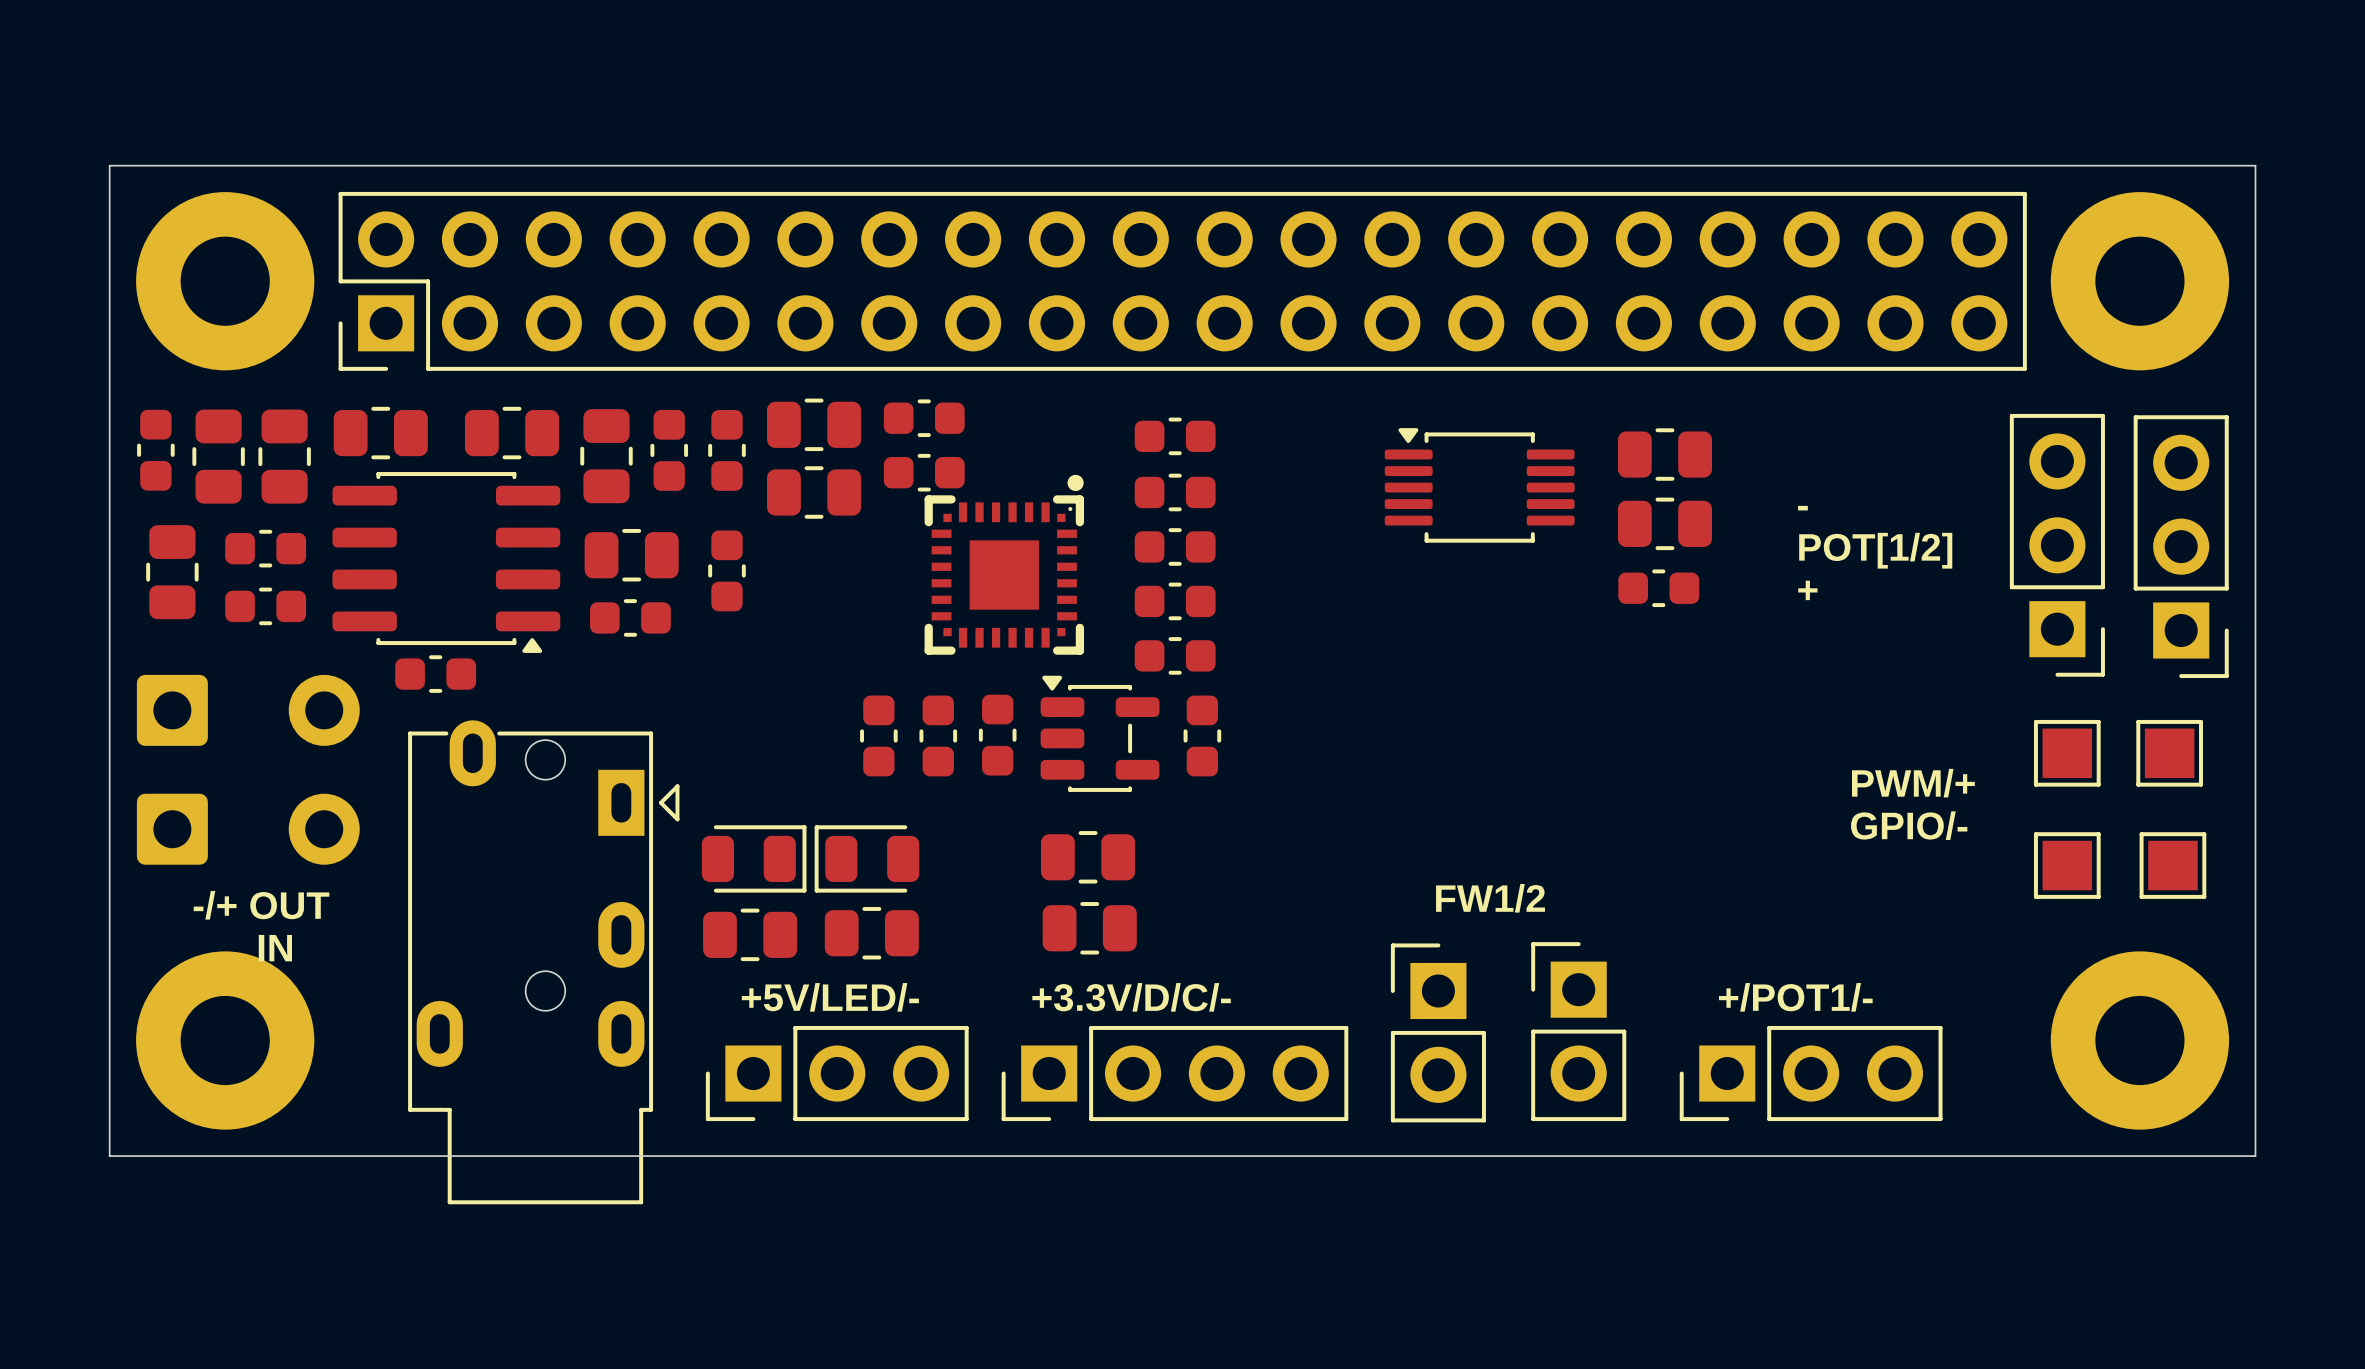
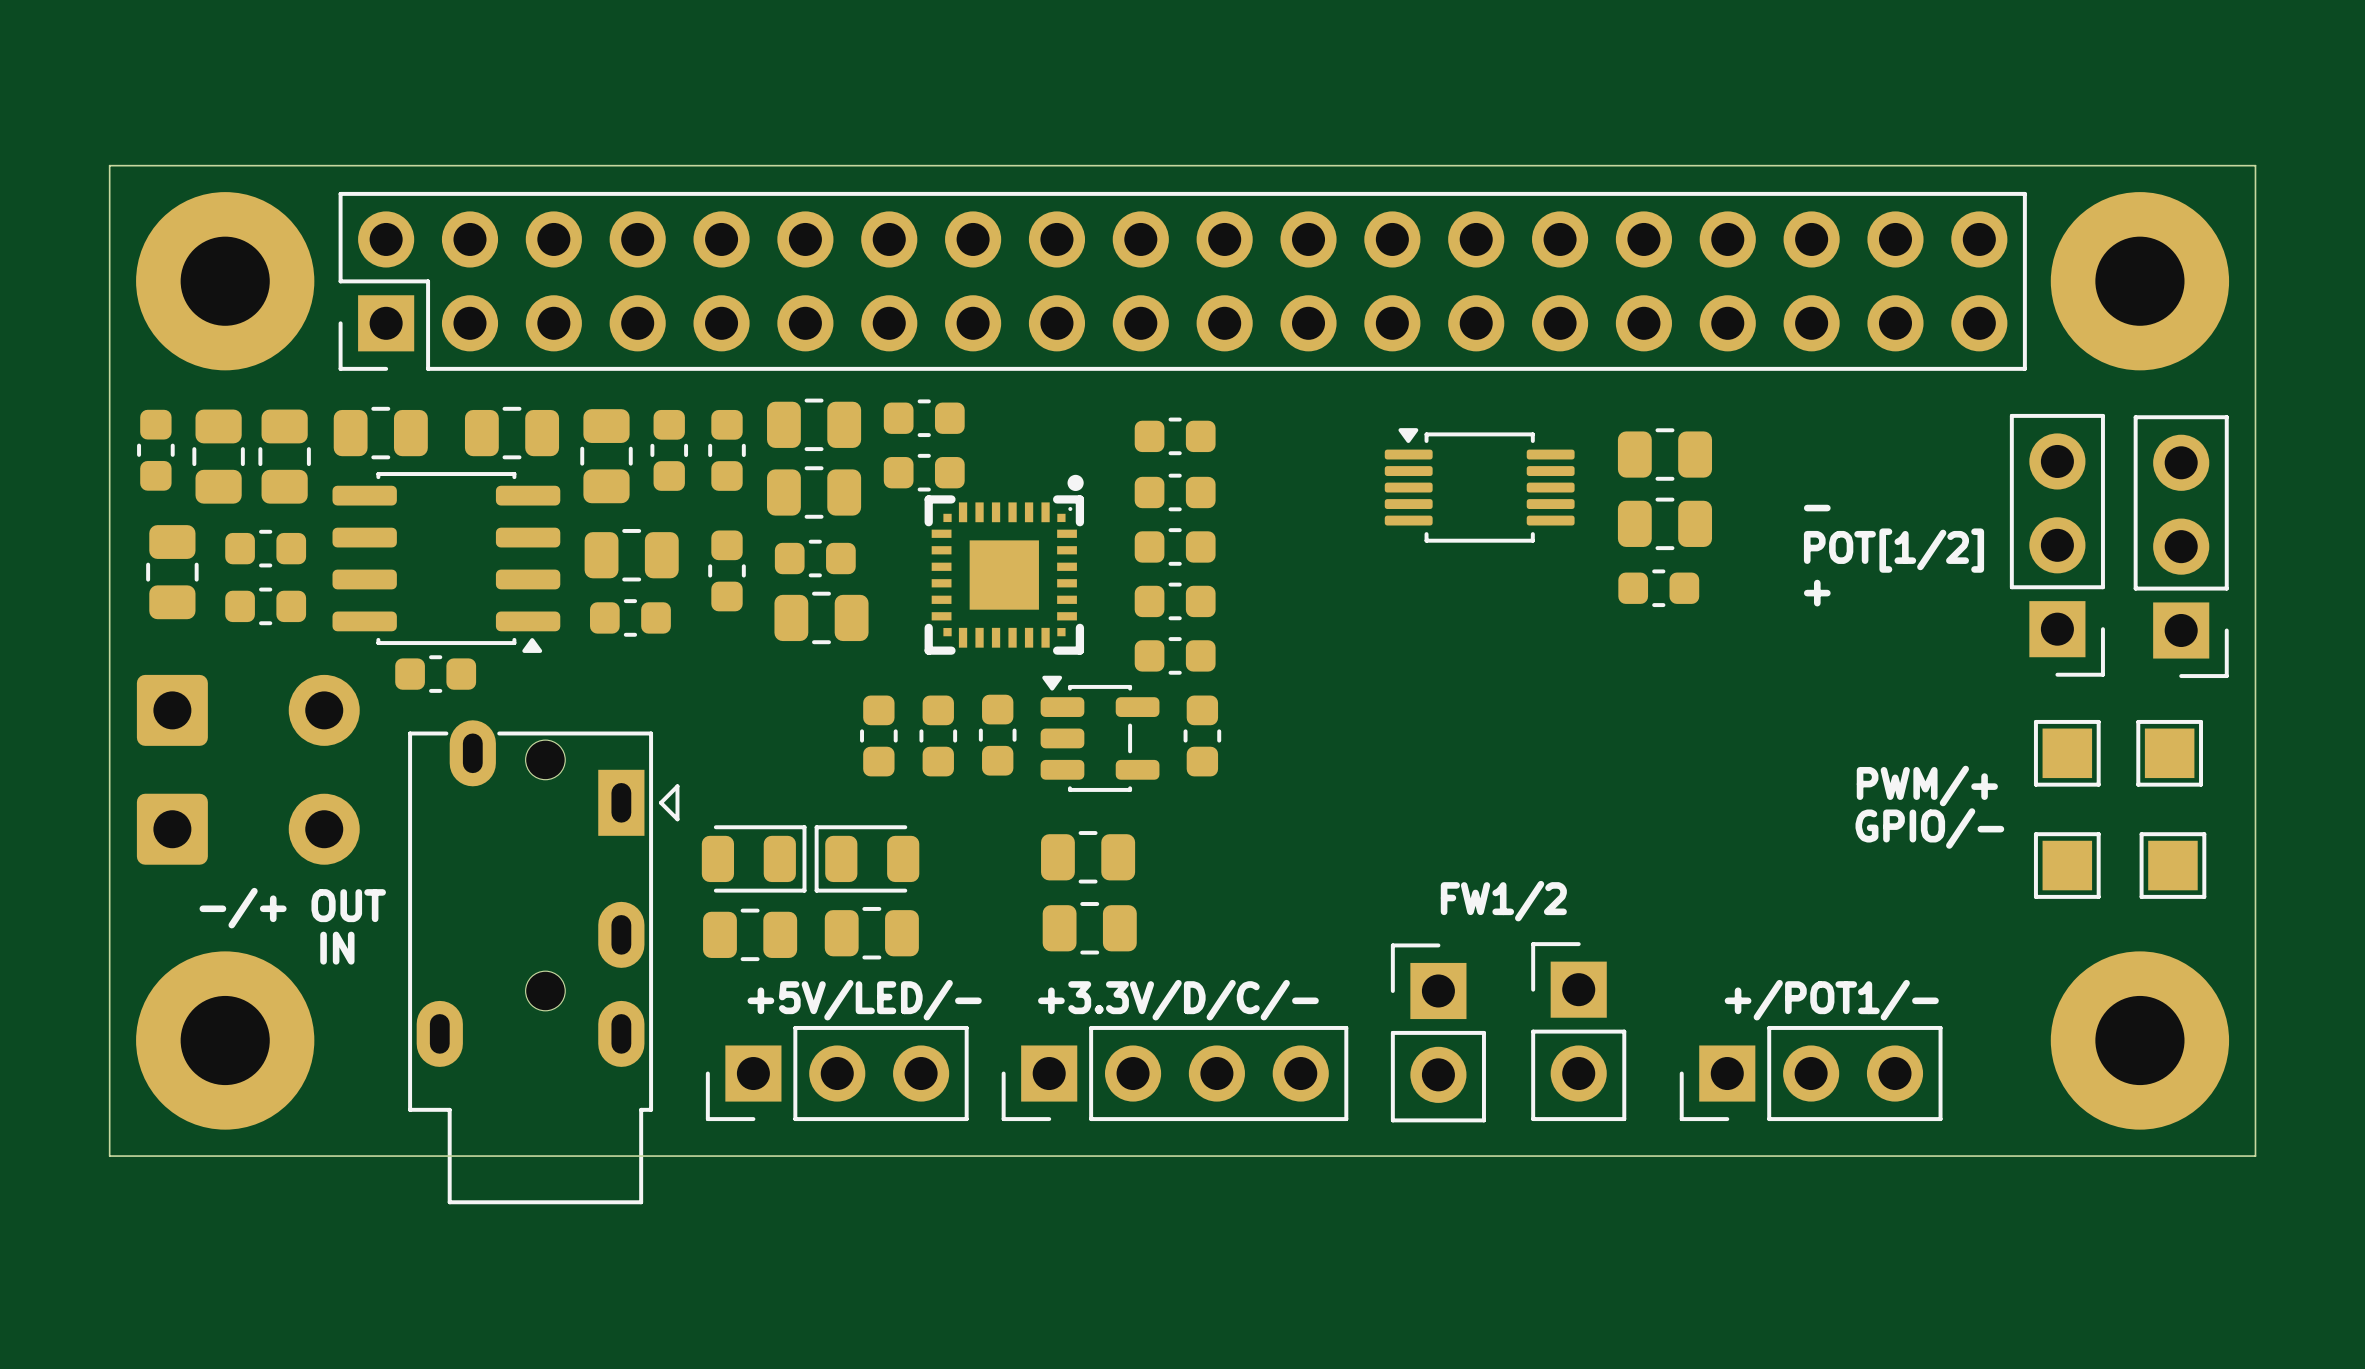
part: none -> (815, 558)
part: none -> (821, 617)

